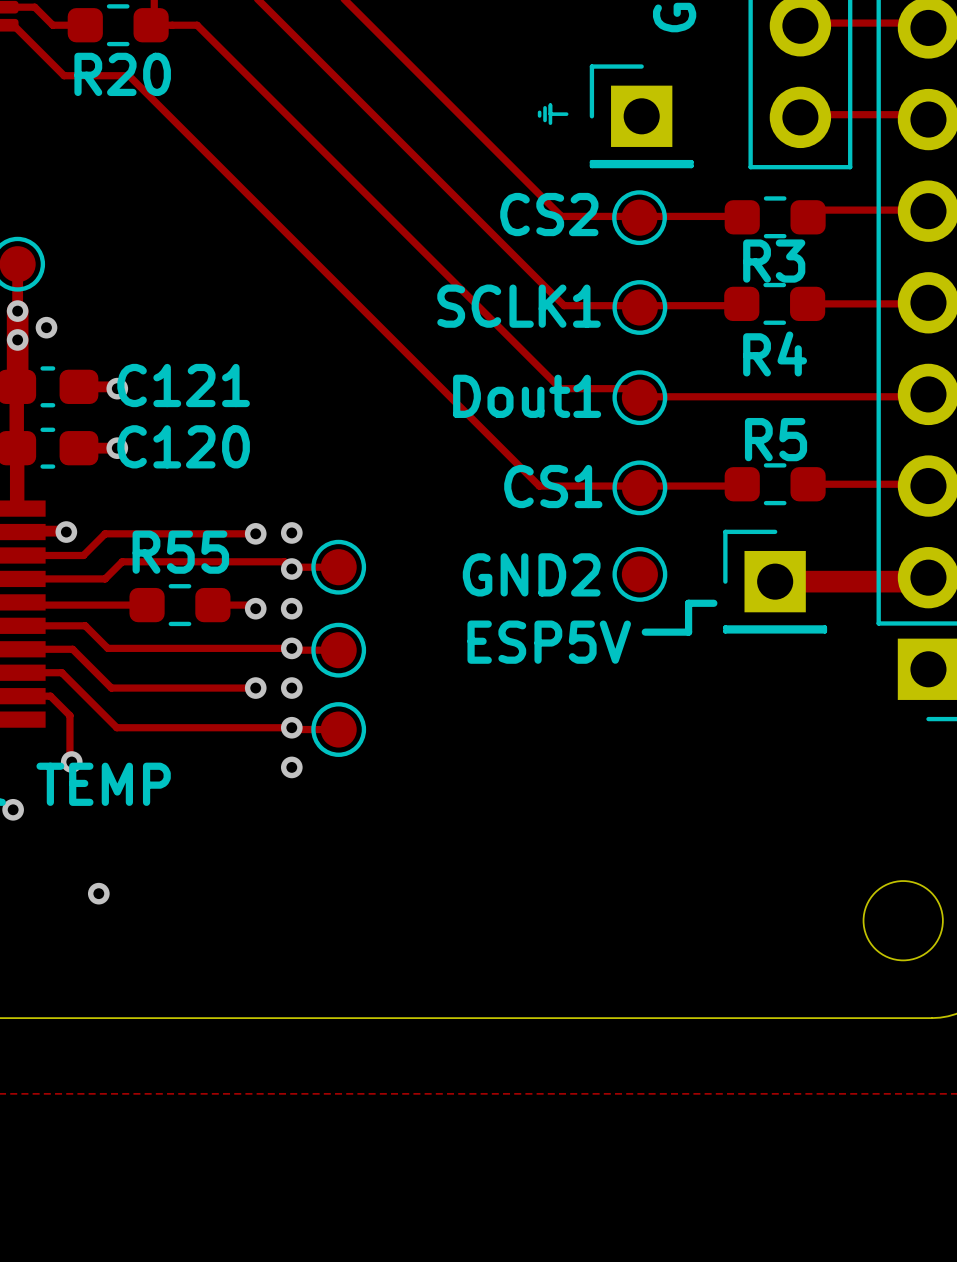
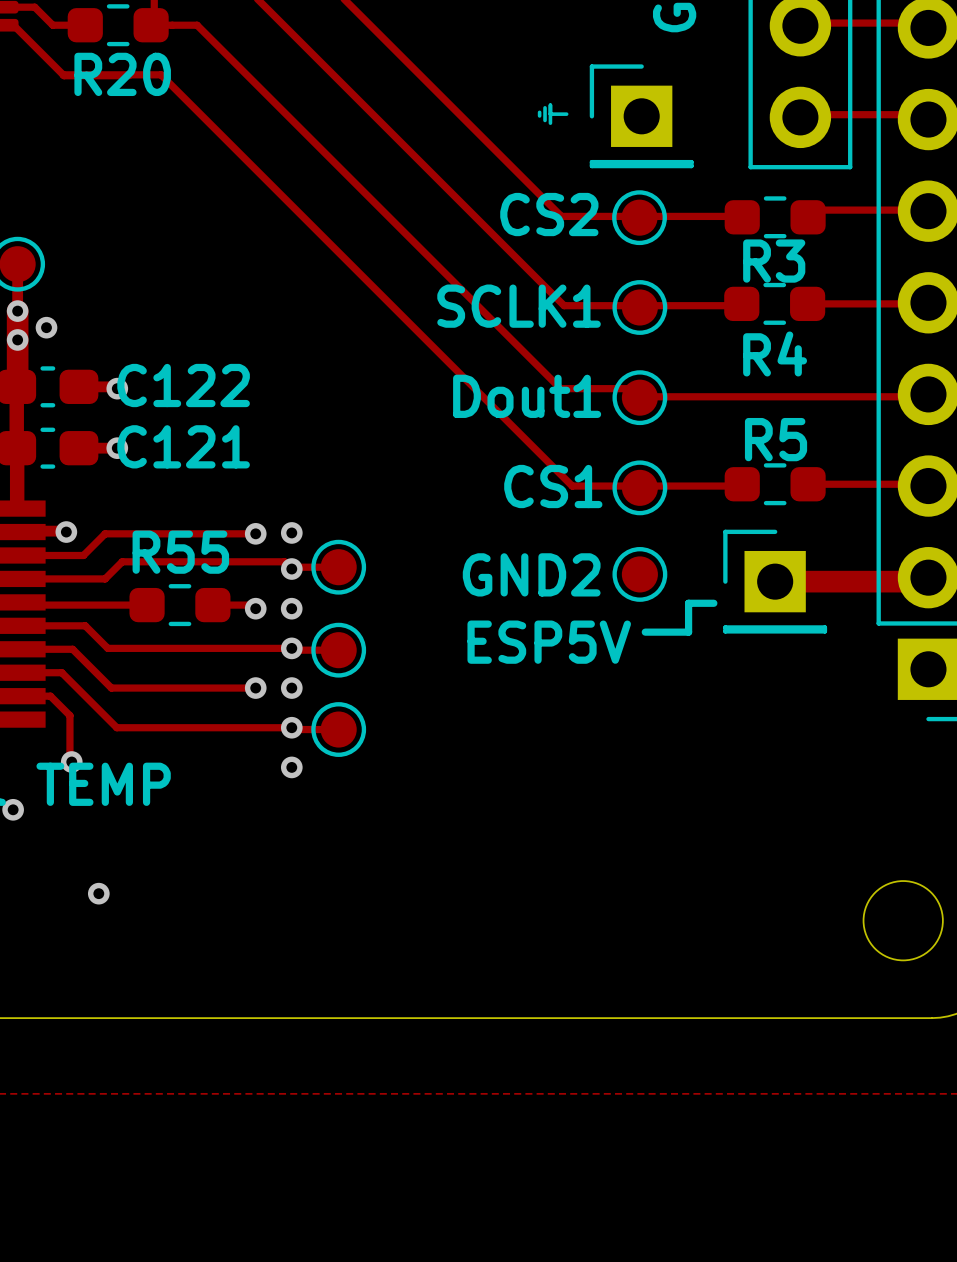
track: (129, 76) (539, 486) (572, 486) -> (63, 74) (161, 74) (572, 486)
C121 name: C121 (183, 385) -> C122 (183, 385)
C120 name: C120 (183, 446) -> C121 (183, 446)

